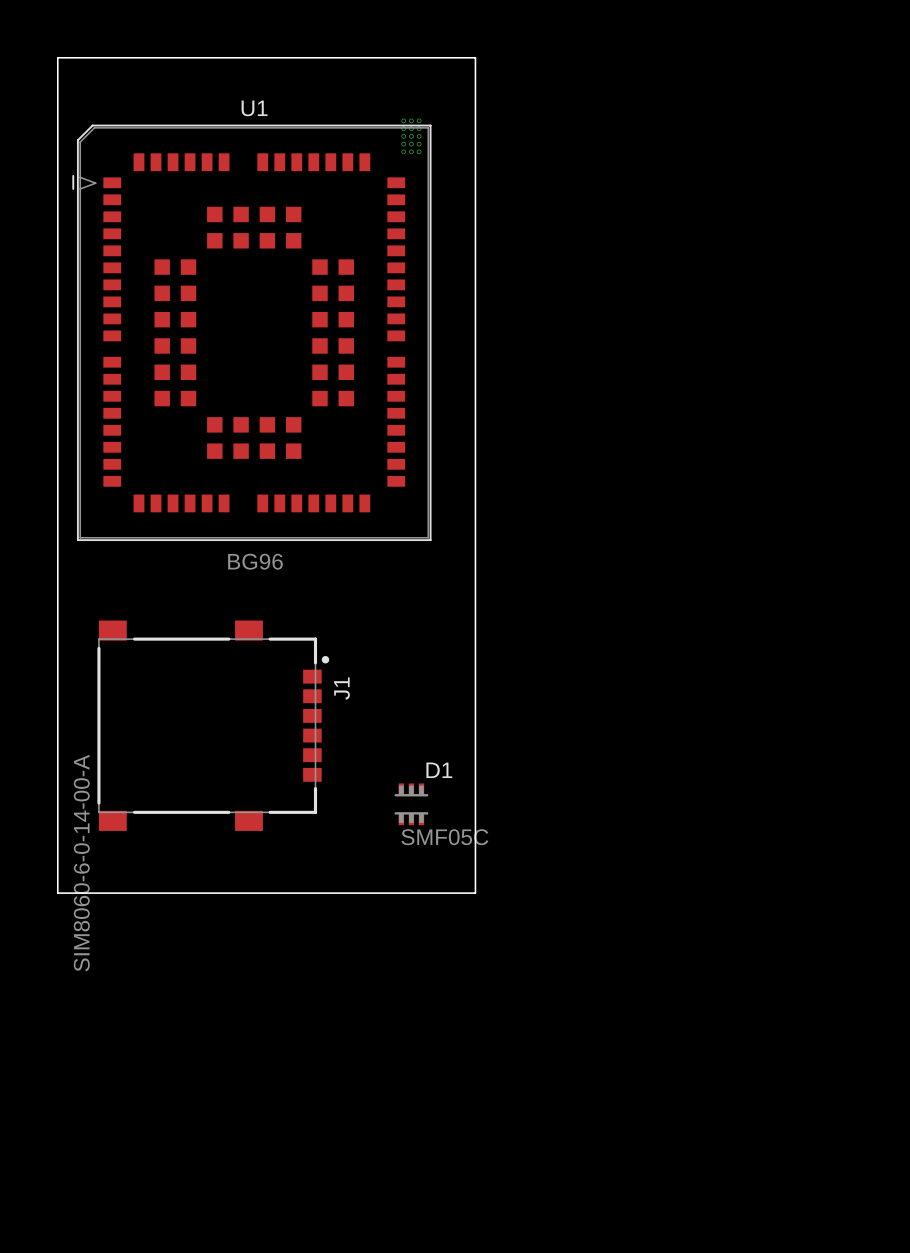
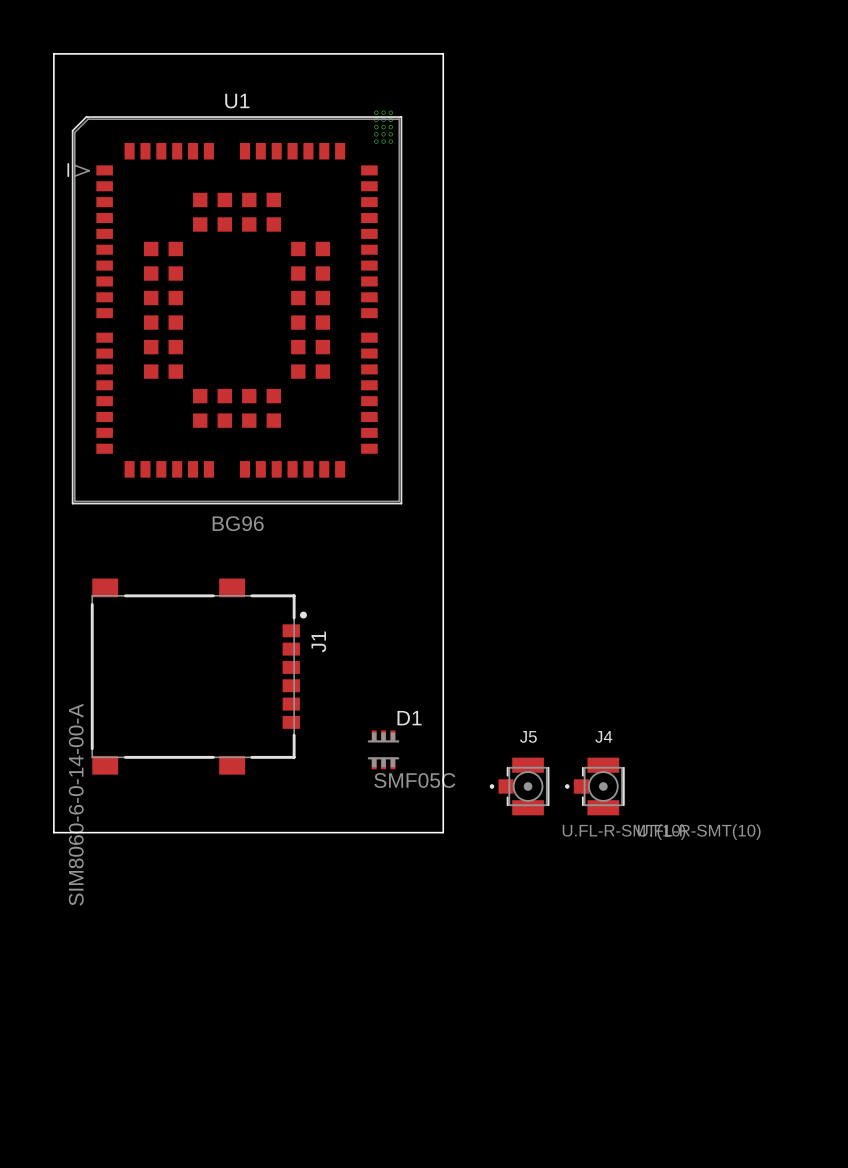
J5: none -> U.FL-R-SMT(10) (519, 786)
J4: none -> U.FL-R-SMT(10) (594, 786)

